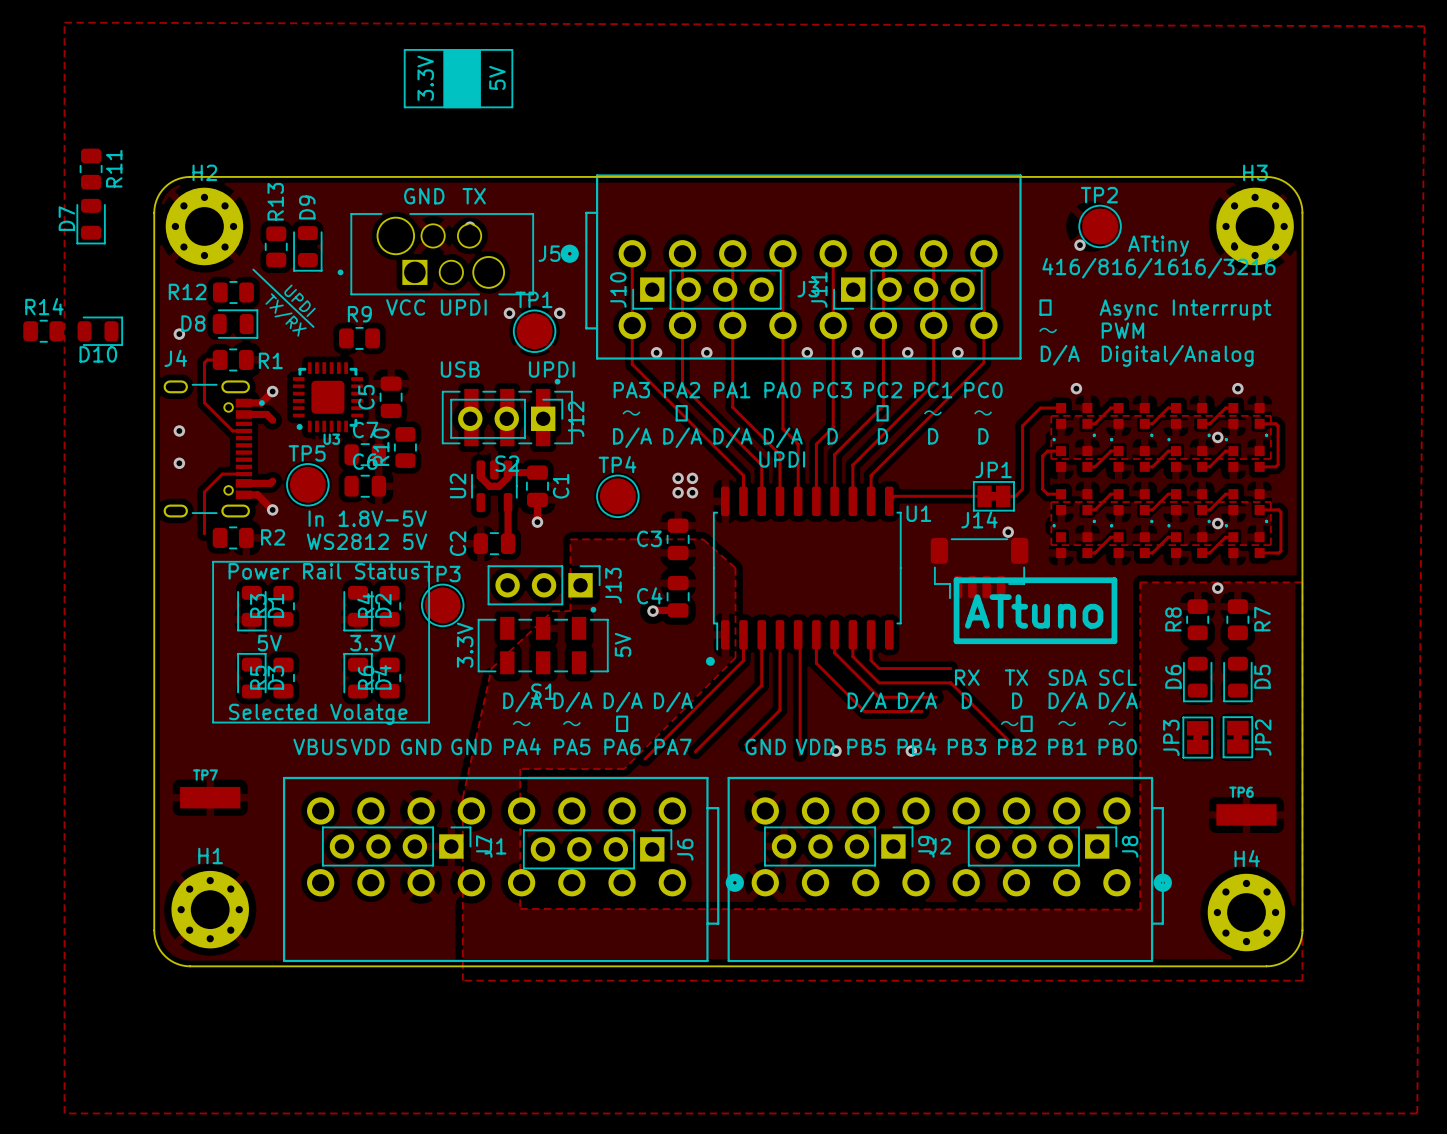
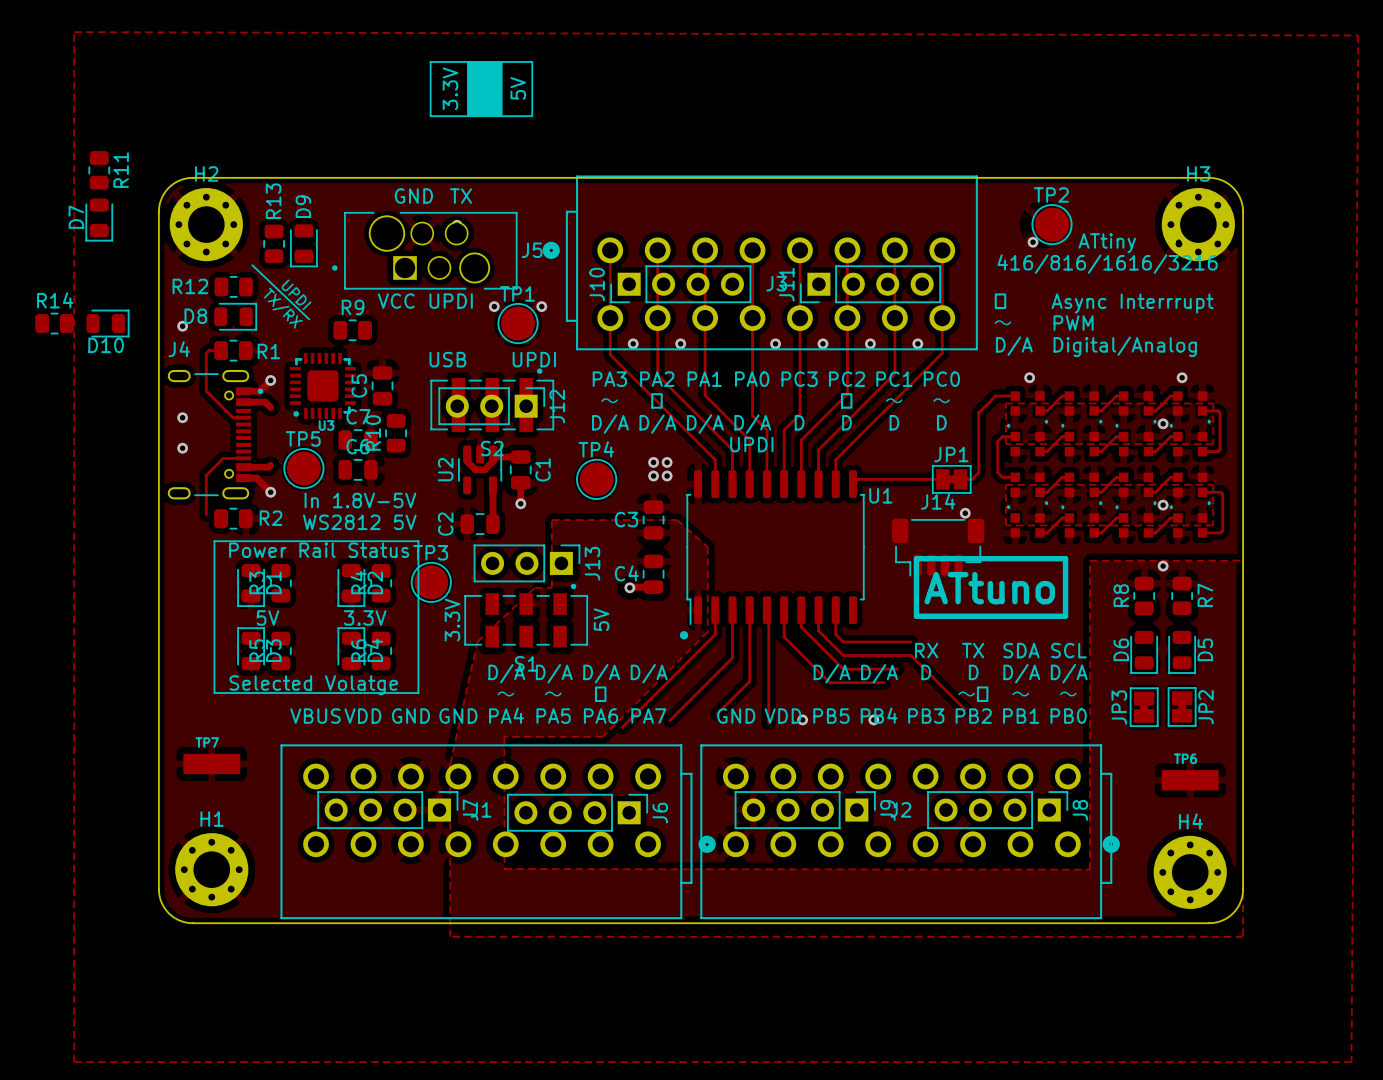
line: (404, 49) (512, 49) (512, 107) (404, 107) (404, 49) -> (430, 61) (532, 61) (532, 116) (430, 116) (430, 61)
text position: 5V (497, 77) -> 5V (518, 88)
text position: 3.3V (425, 78) -> 3.3V (450, 88)
drawing position: (462, 78) -> (484, 89)

